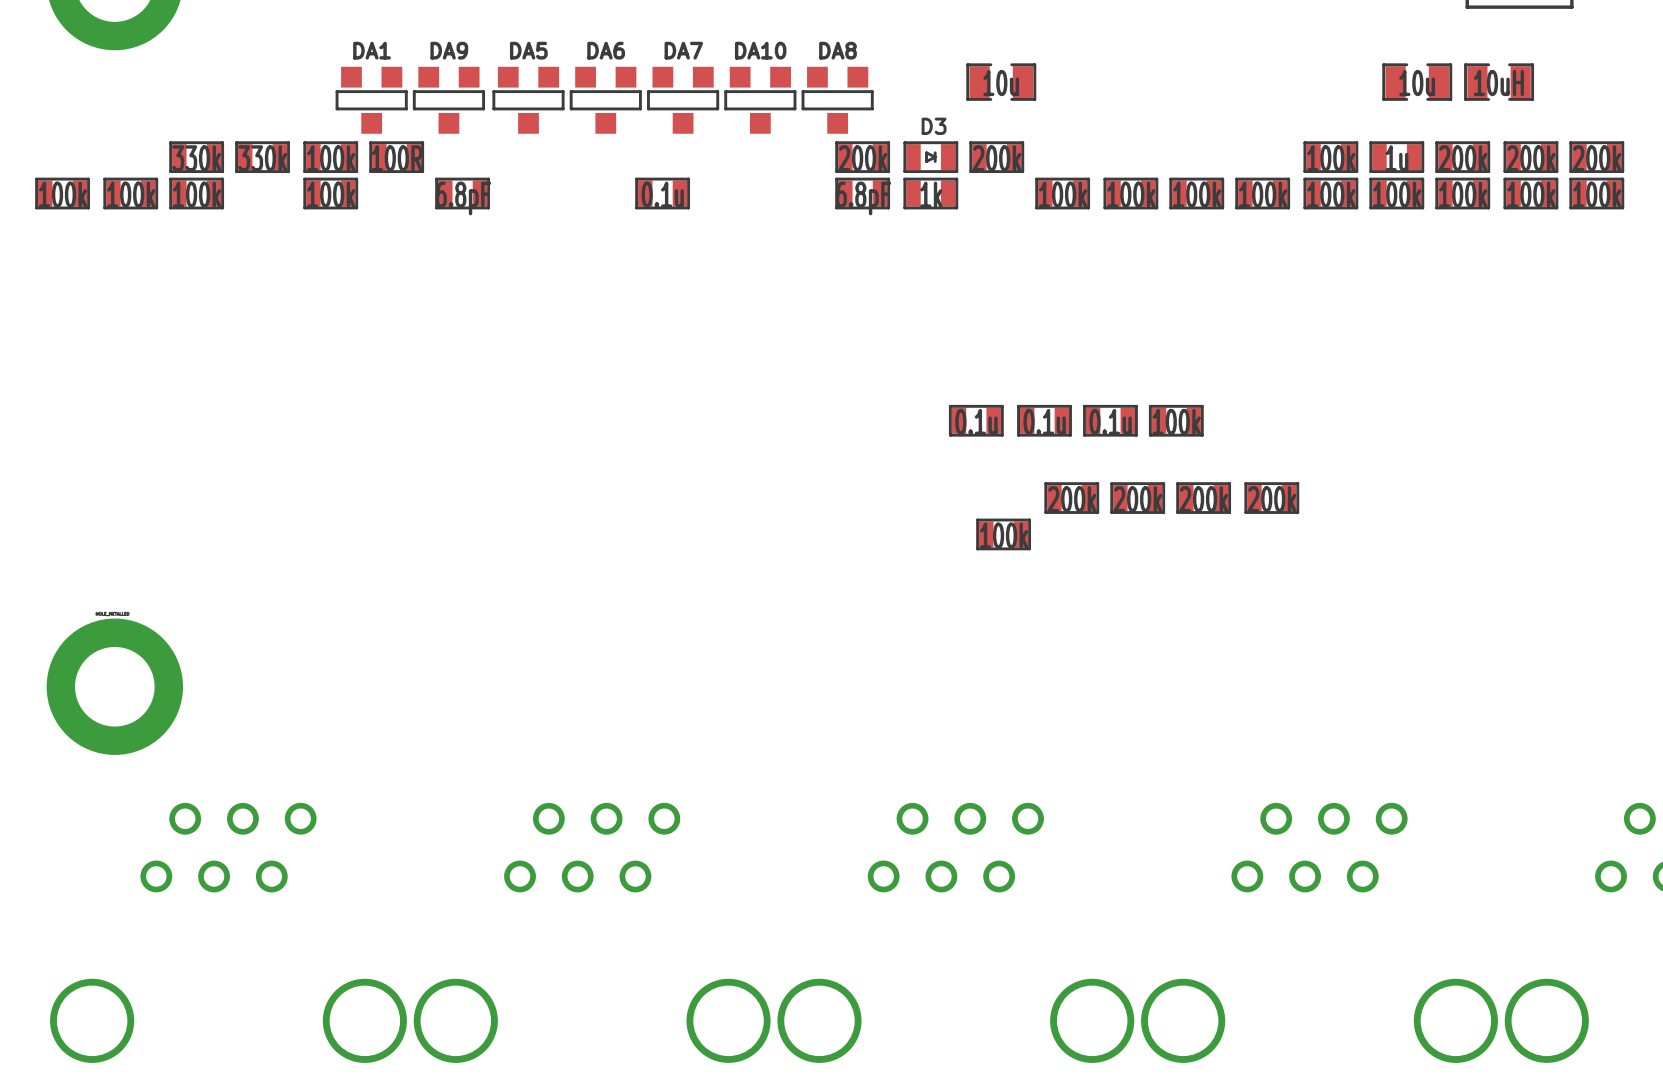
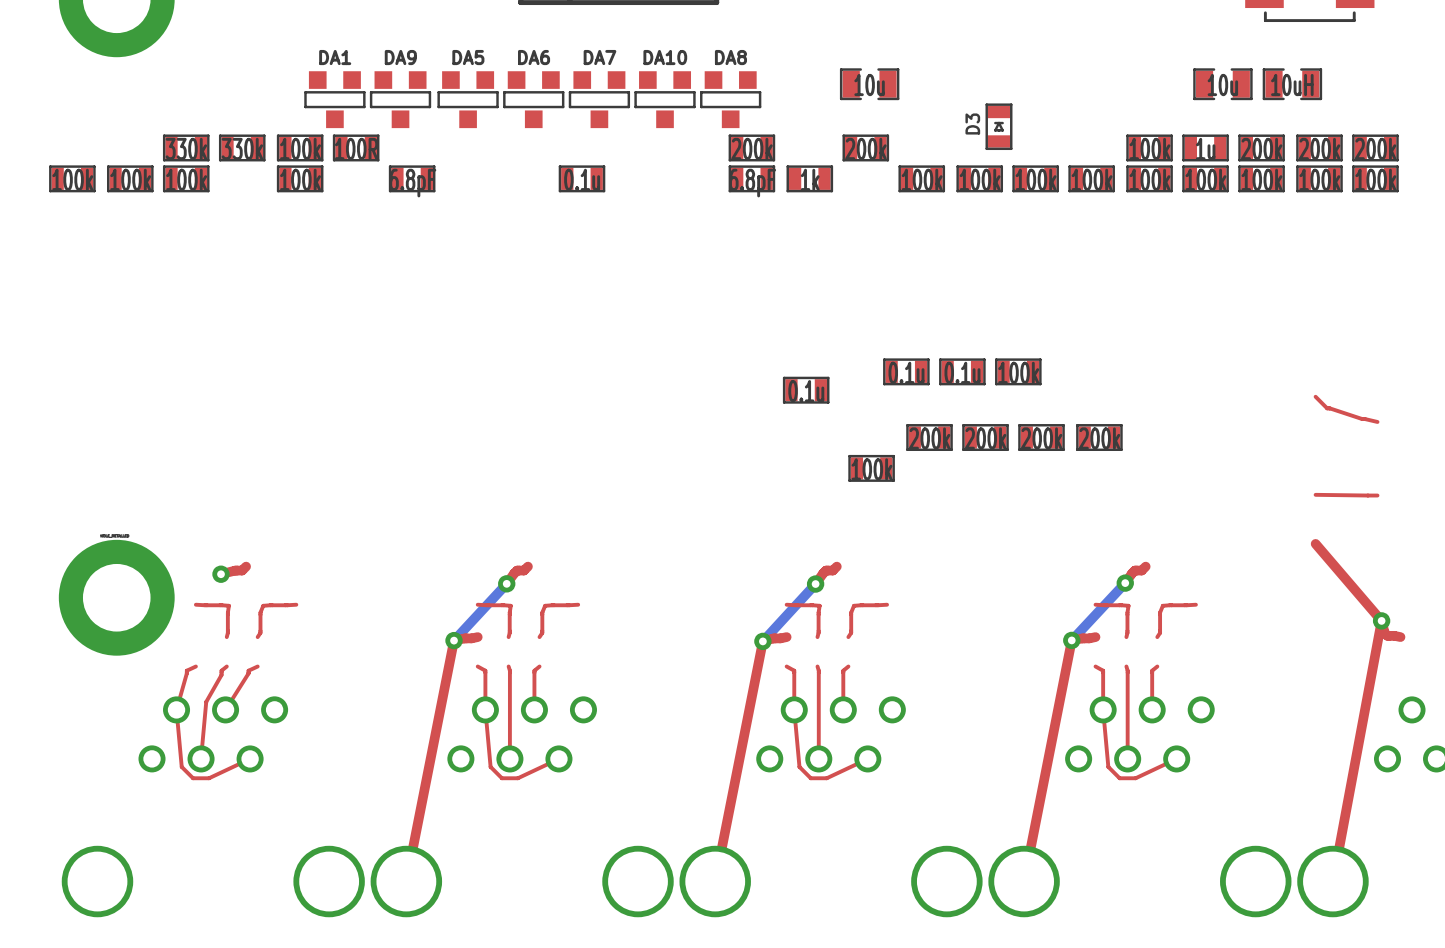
D3 rotation: 0° (930, 157) -> 90° counterclockwise (998, 126)
D3 position: (930, 157) -> (998, 126)
part position: (976, 420) -> (806, 390)
top track: none -> (1315, 396) (1327, 408) (1377, 421)
top track: none -> (1315, 494) (1377, 495)
top track: none -> (1315, 543) (1381, 620)
top track: none -> (246, 566) (242, 570) (221, 574)
top track: none -> (527, 566) (523, 570) (517, 570) (506, 583)
top track: none -> (836, 566) (832, 570) (825, 570) (815, 584)
top track: none -> (1145, 566) (1141, 570) (1134, 570) (1125, 583)
via: none -> (221, 574)
bottom track: none -> (1125, 583) (1071, 640)
via: none -> (1125, 583)
bottom track: none -> (506, 583) (454, 640)
via: none -> (506, 583)
bottom track: none -> (815, 584) (762, 641)
via: none -> (815, 584)
top track: none -> (195, 604) (228, 605) (226, 637)
top track: none -> (296, 604) (263, 605) (260, 612) (260, 632) (257, 637)
top track: none -> (477, 604) (510, 605) (508, 637)
top track: none -> (578, 604) (545, 605) (542, 612) (542, 632) (539, 637)
top track: none -> (786, 604) (819, 605) (817, 637)
top track: none -> (887, 604) (853, 605) (851, 612) (851, 632) (848, 637)
top track: none -> (1095, 604) (1128, 605) (1126, 637)
top track: none -> (1195, 604) (1162, 605) (1160, 612) (1160, 632) (1157, 637)
top track: none -> (1381, 620) (1384, 632) (1387, 635) (1400, 637)
top track: none -> (1381, 620) (1332, 881)
via: none -> (1381, 620)
top track: none -> (477, 637) (454, 640) (406, 881)
top track: none -> (786, 637) (762, 641) (715, 881)
top track: none -> (1095, 637) (1071, 640) (1024, 881)
via: none -> (1071, 640)
via: none -> (454, 640)
via: none -> (762, 641)
top track: none -> (195, 666) (186, 670) (176, 709) (181, 766) (193, 778) (209, 778) (250, 758)
top track: none -> (226, 666) (221, 670) (221, 675) (206, 701) (201, 758)
top track: none -> (257, 666) (248, 670) (225, 709)
top track: none -> (477, 666) (485, 670) (485, 709) (490, 766) (501, 778) (517, 778) (558, 758)
top track: none -> (508, 666) (509, 758)
top track: none -> (539, 666) (534, 670) (534, 709)
top track: none -> (786, 666) (794, 670) (794, 709) (799, 766) (810, 778) (826, 778) (867, 758)
top track: none -> (817, 666) (818, 758)
top track: none -> (848, 666) (843, 670) (843, 709)
top track: none -> (1095, 666) (1103, 670) (1103, 709) (1108, 766) (1119, 778) (1135, 778) (1176, 758)
top track: none -> (1126, 666) (1127, 758)
top track: none -> (1157, 666) (1152, 670) (1152, 709)

